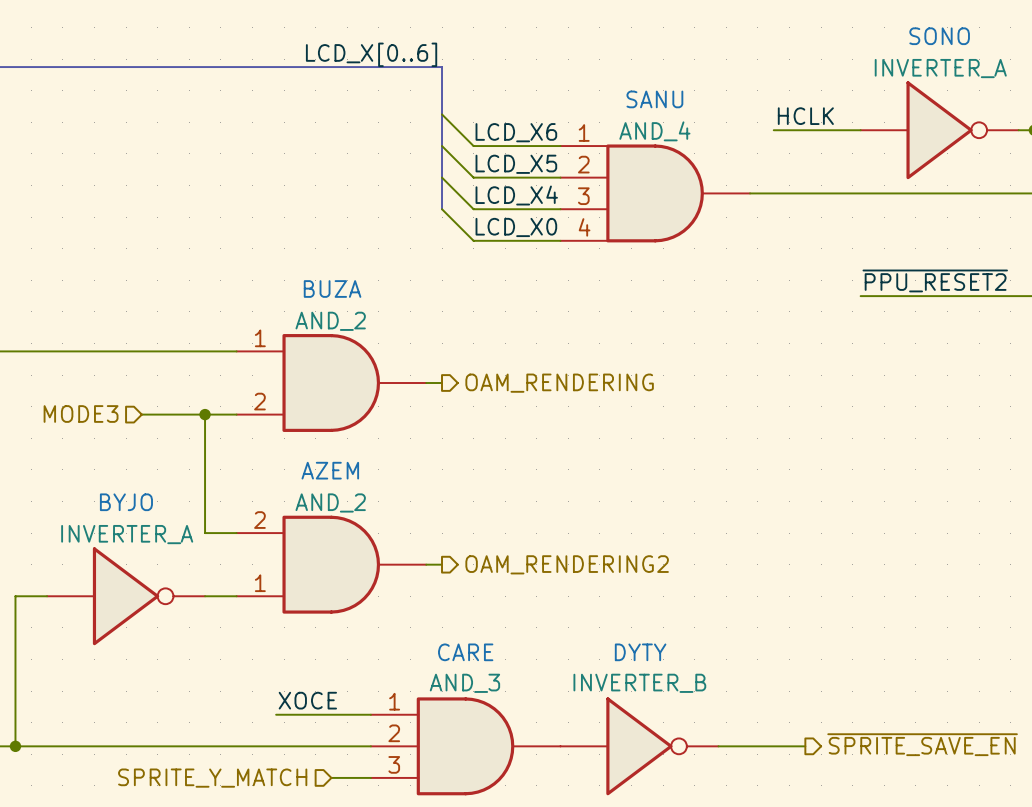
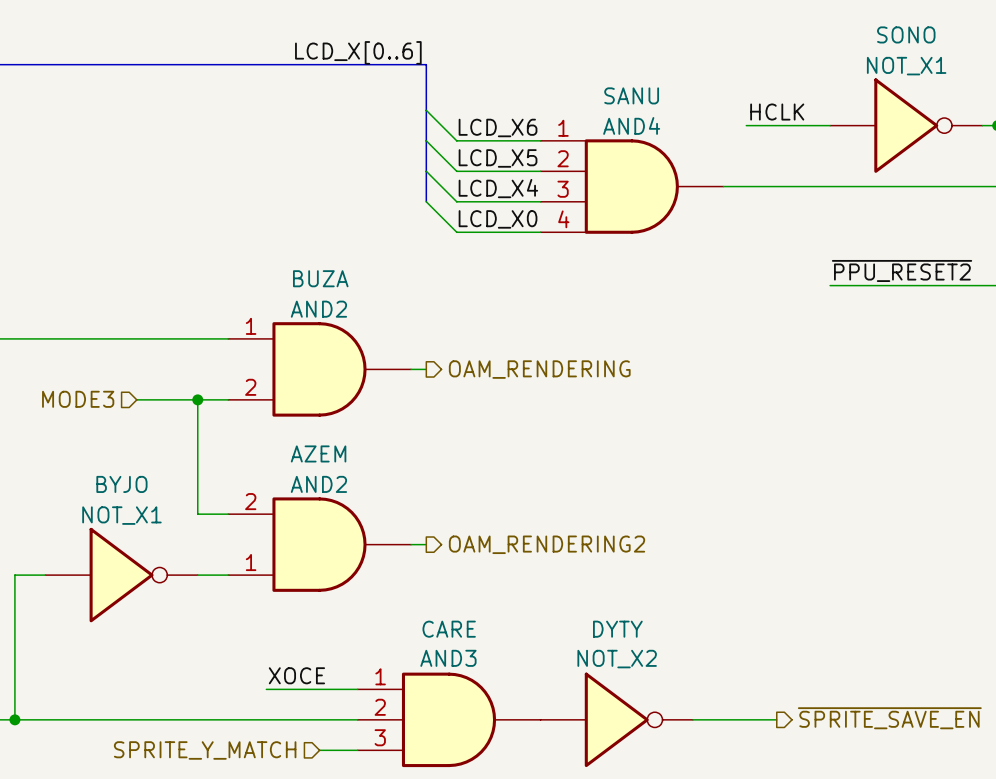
SONO value: INVERTER_A (940, 68) -> NOT_X1 (906, 66)
SANU value: AND_4 (654, 131) -> AND4 (631, 125)
BUZA value: AND_2 (330, 321) -> AND2 (318, 309)
AZEM value: AND_2 (330, 502) -> AND2 (318, 484)
BYJO value: INVERTER_A (127, 534) -> NOT_X1 (121, 515)
CARE value: AND_3 (464, 683) -> AND3 (448, 658)
DYTY value: INVERTER_B (639, 683) -> NOT_X2 (617, 659)

